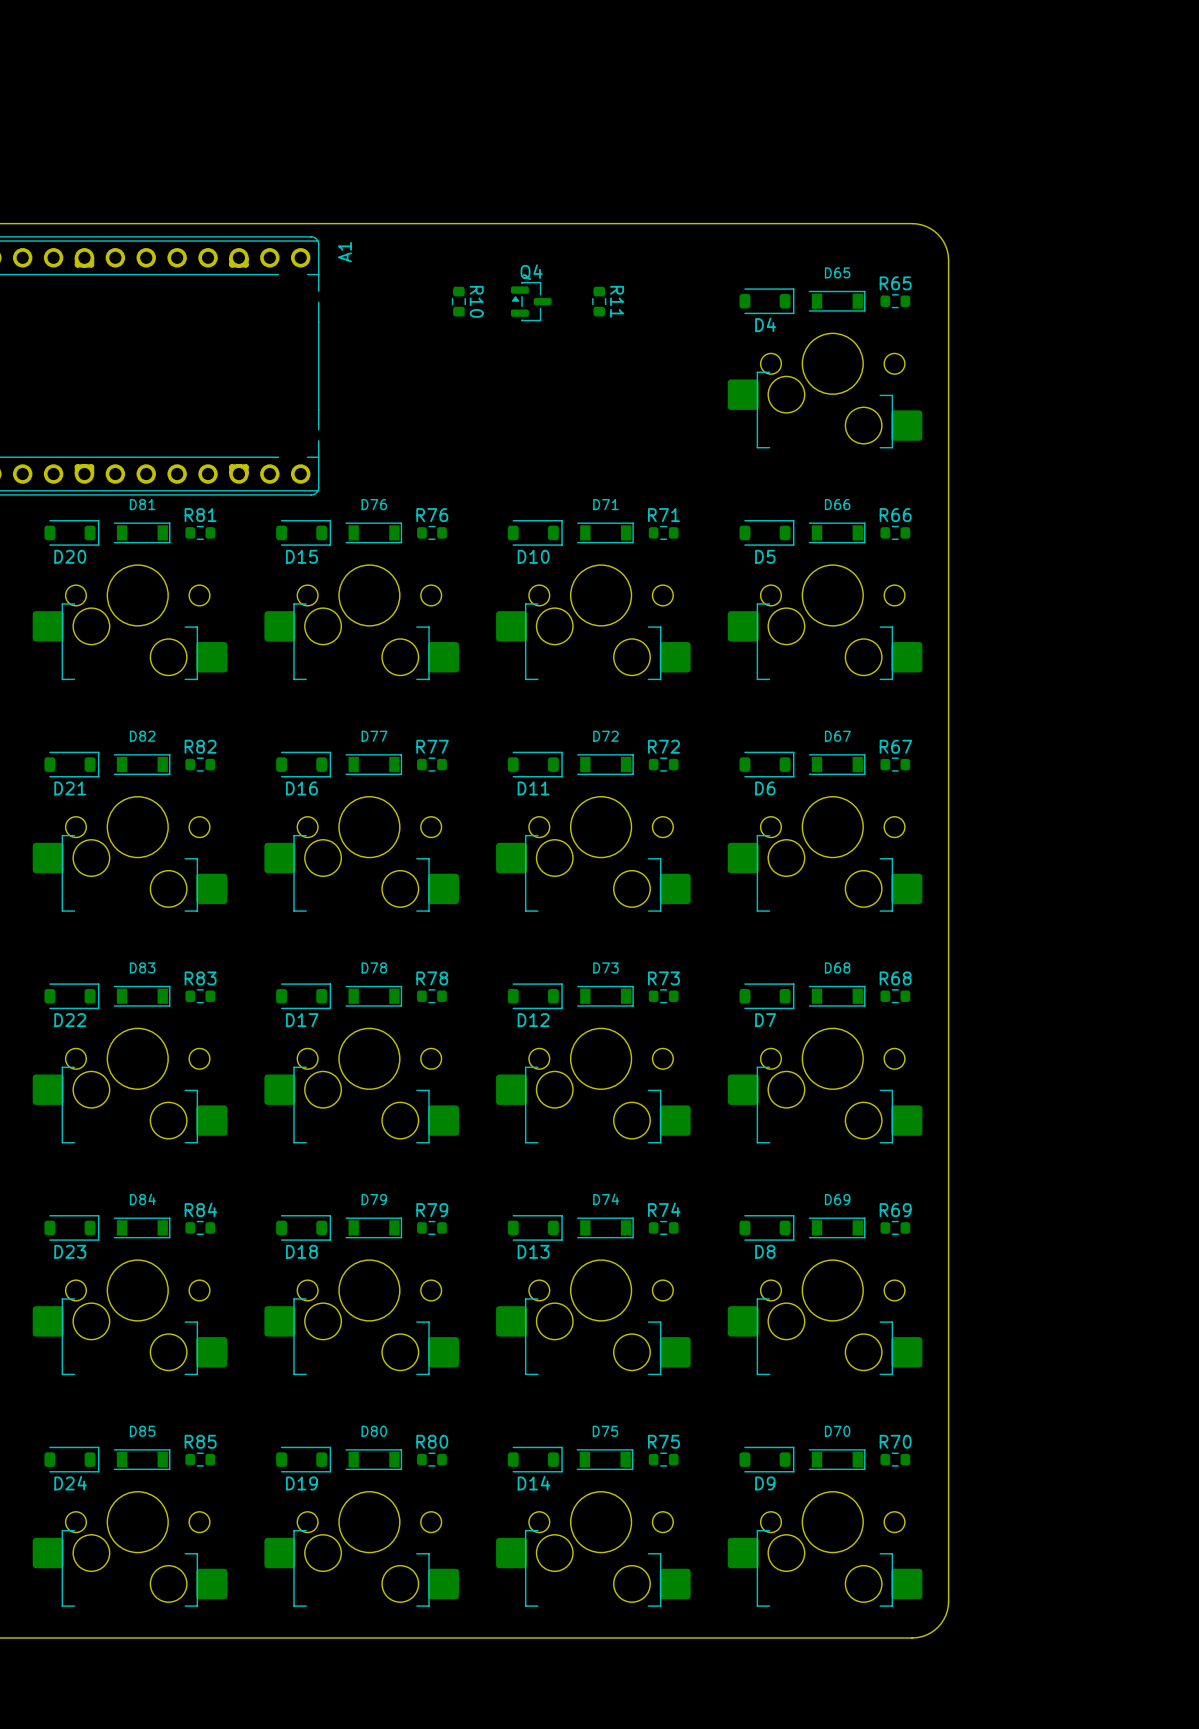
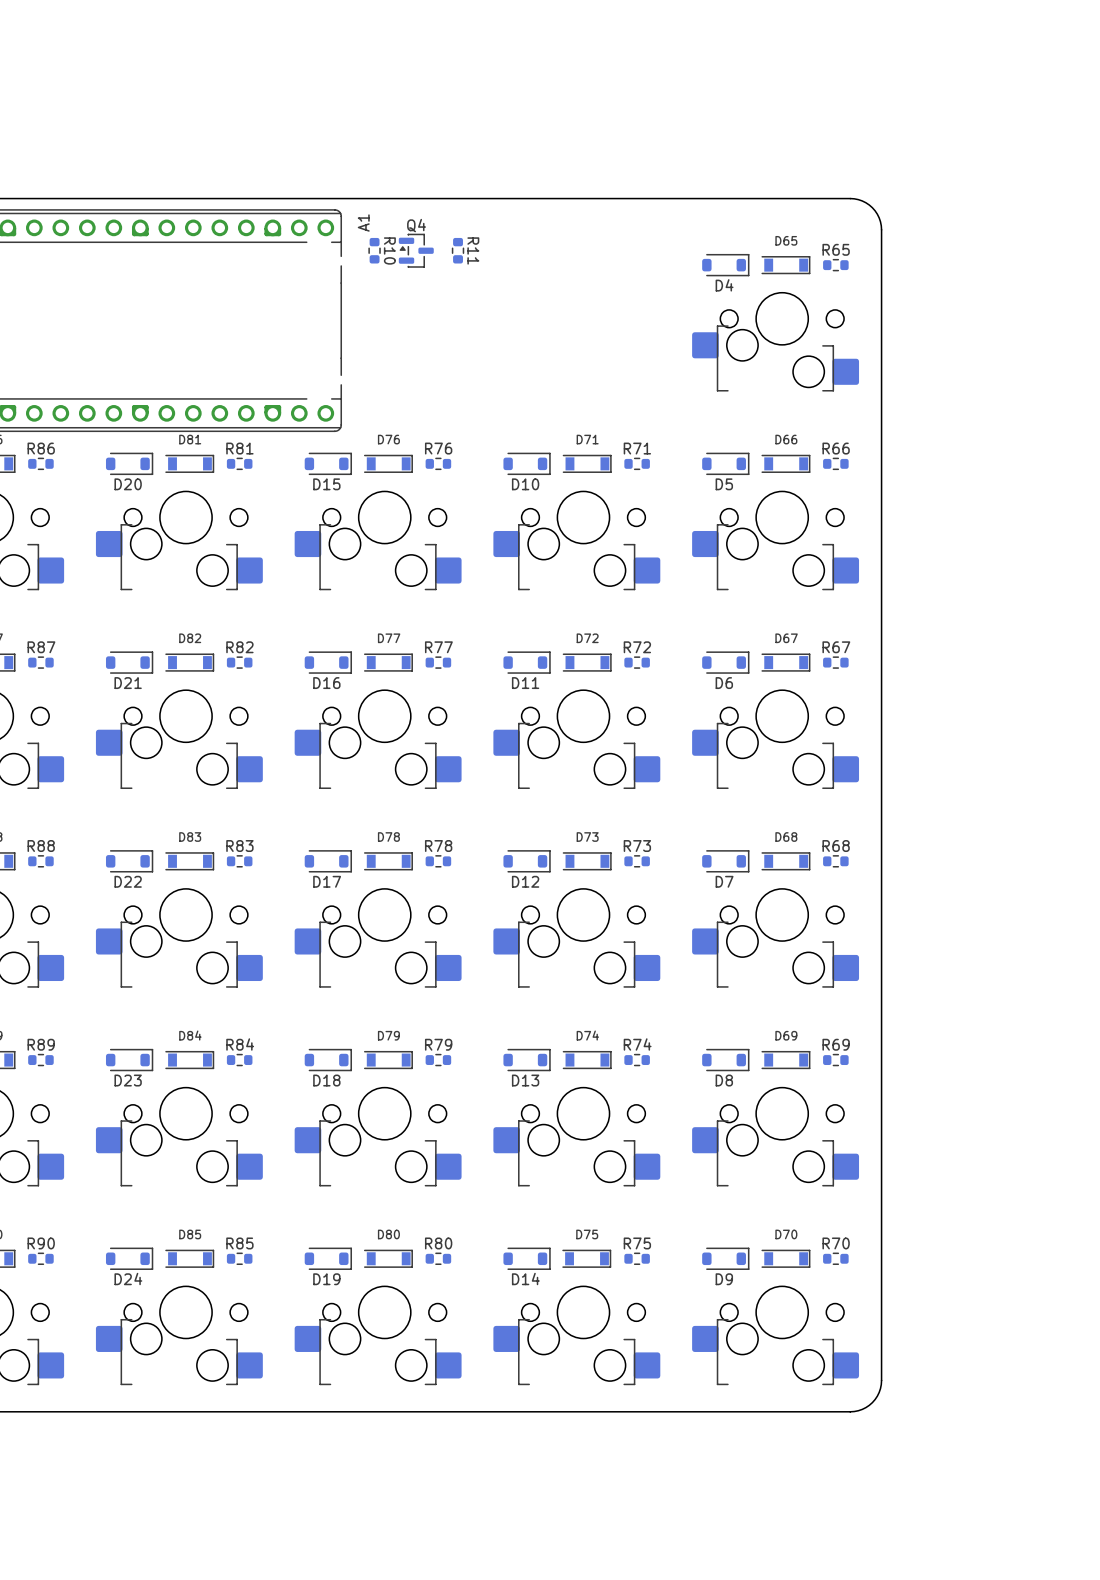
R10 position: (458, 301) -> (374, 250)
Q4 position: (531, 301) -> (416, 250)
R11 position: (599, 301) -> (458, 250)

